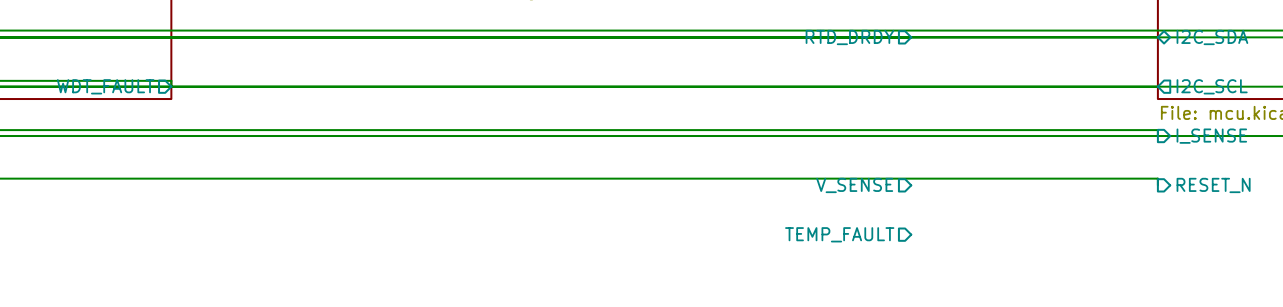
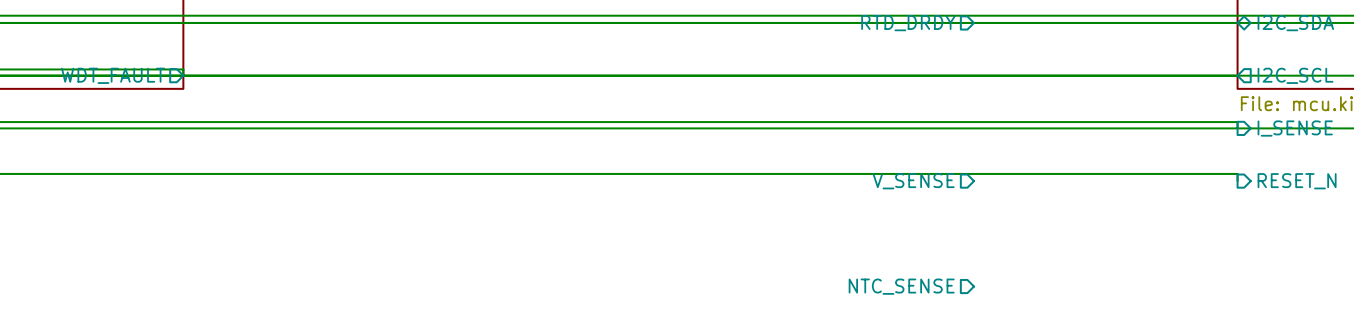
sheet pin: TEMP_FAULT (839, 234) -> none
sheet pin: none -> NTC_SENSE (901, 286)

